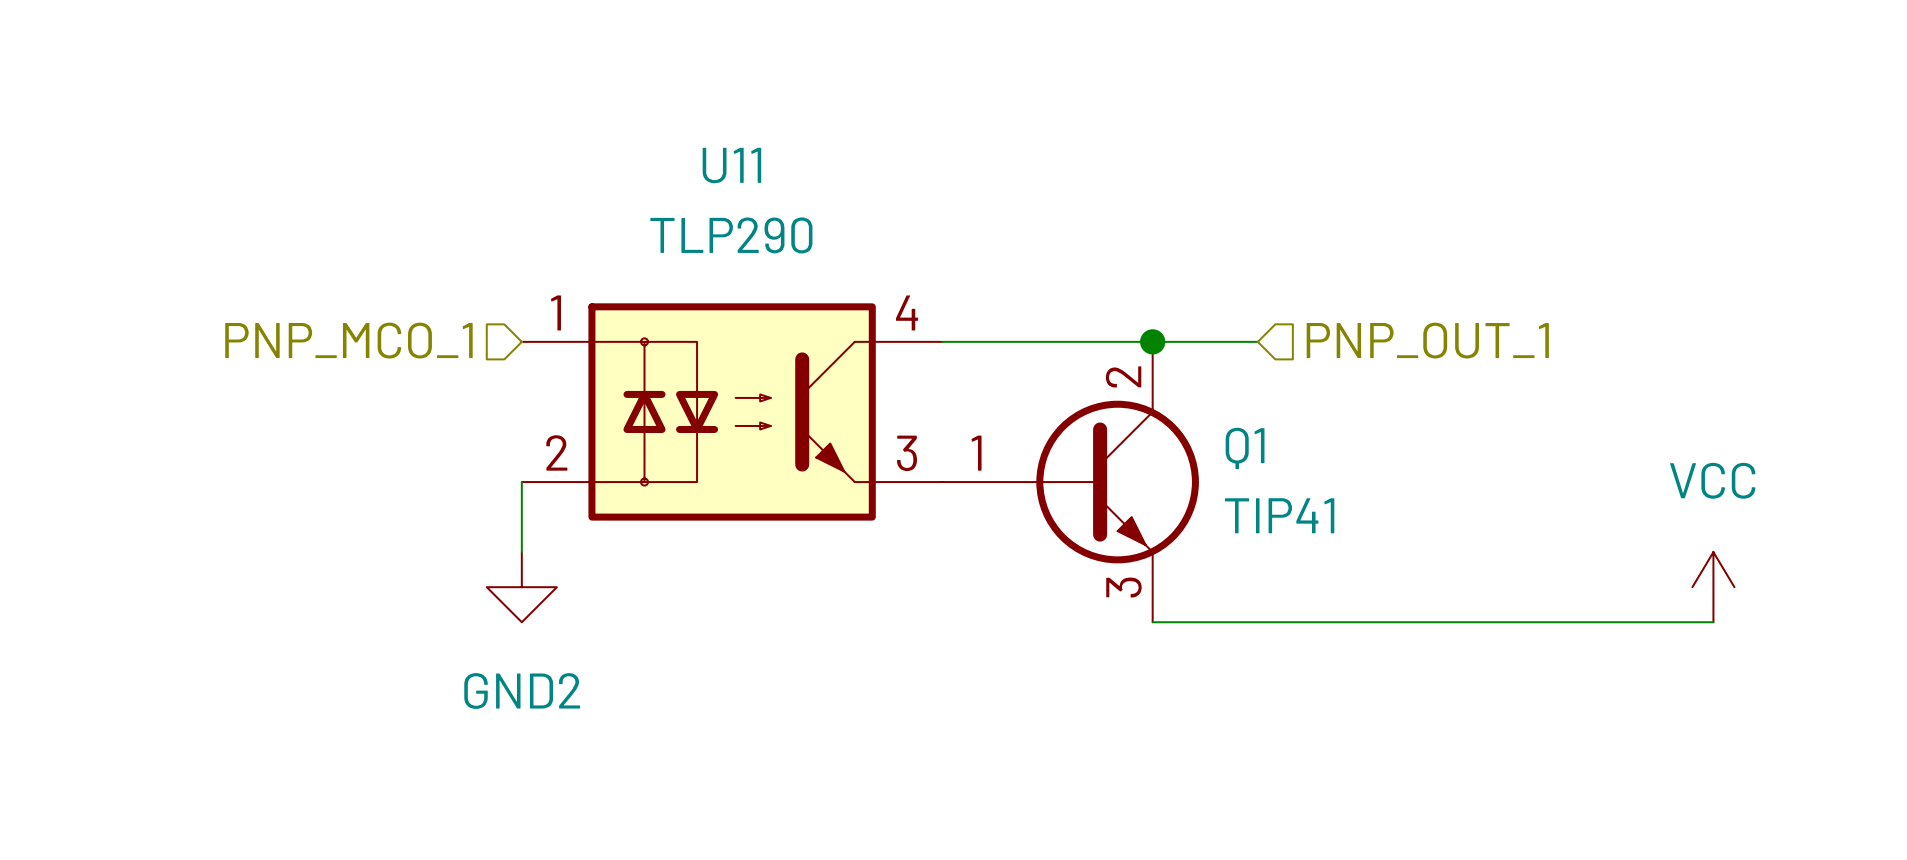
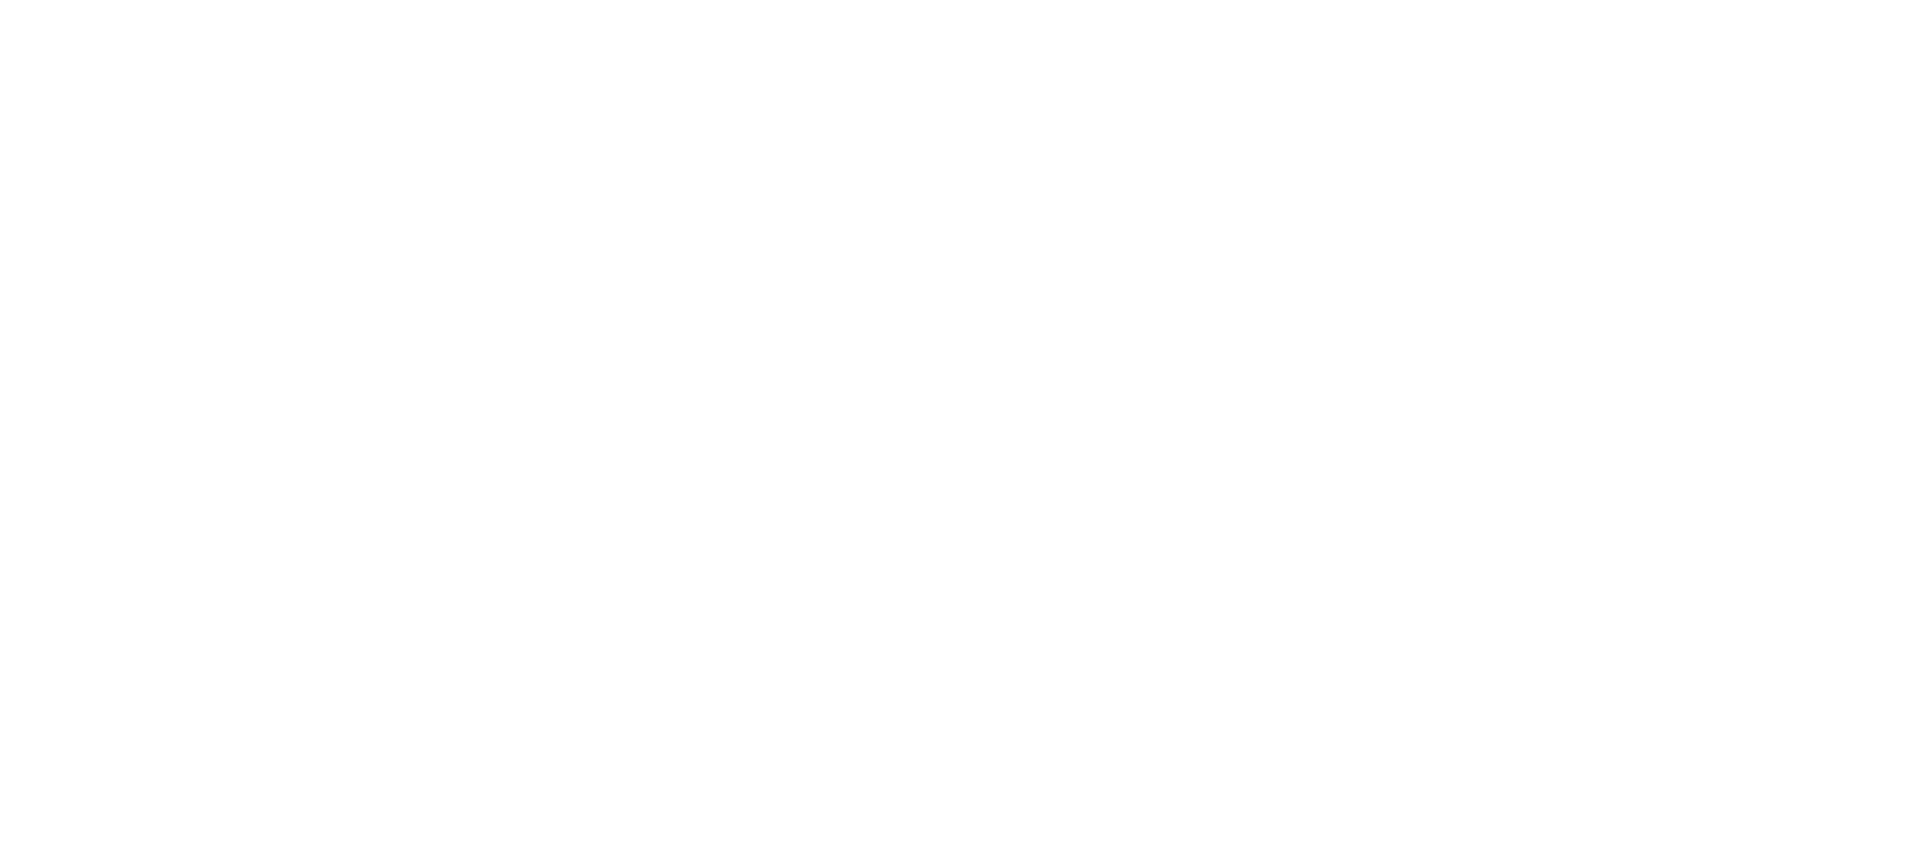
hierarchical label: PNP_MCO_1 (348, 340) -> none
hierarchical label: PNP_OUT_1 (1427, 340) -> none
wire: (942, 341) (1257, 341) -> none
junction: (1152, 341) -> none
U11: TLP290 (732, 411) -> none
wire: (521, 482) (521, 552) -> none
Q1: TIP41 (1070, 482) -> none
power symbol: GND2 (521, 587) -> none
power symbol: VCC (1713, 587) -> none
wire: (1152, 622) (1713, 622) -> none

